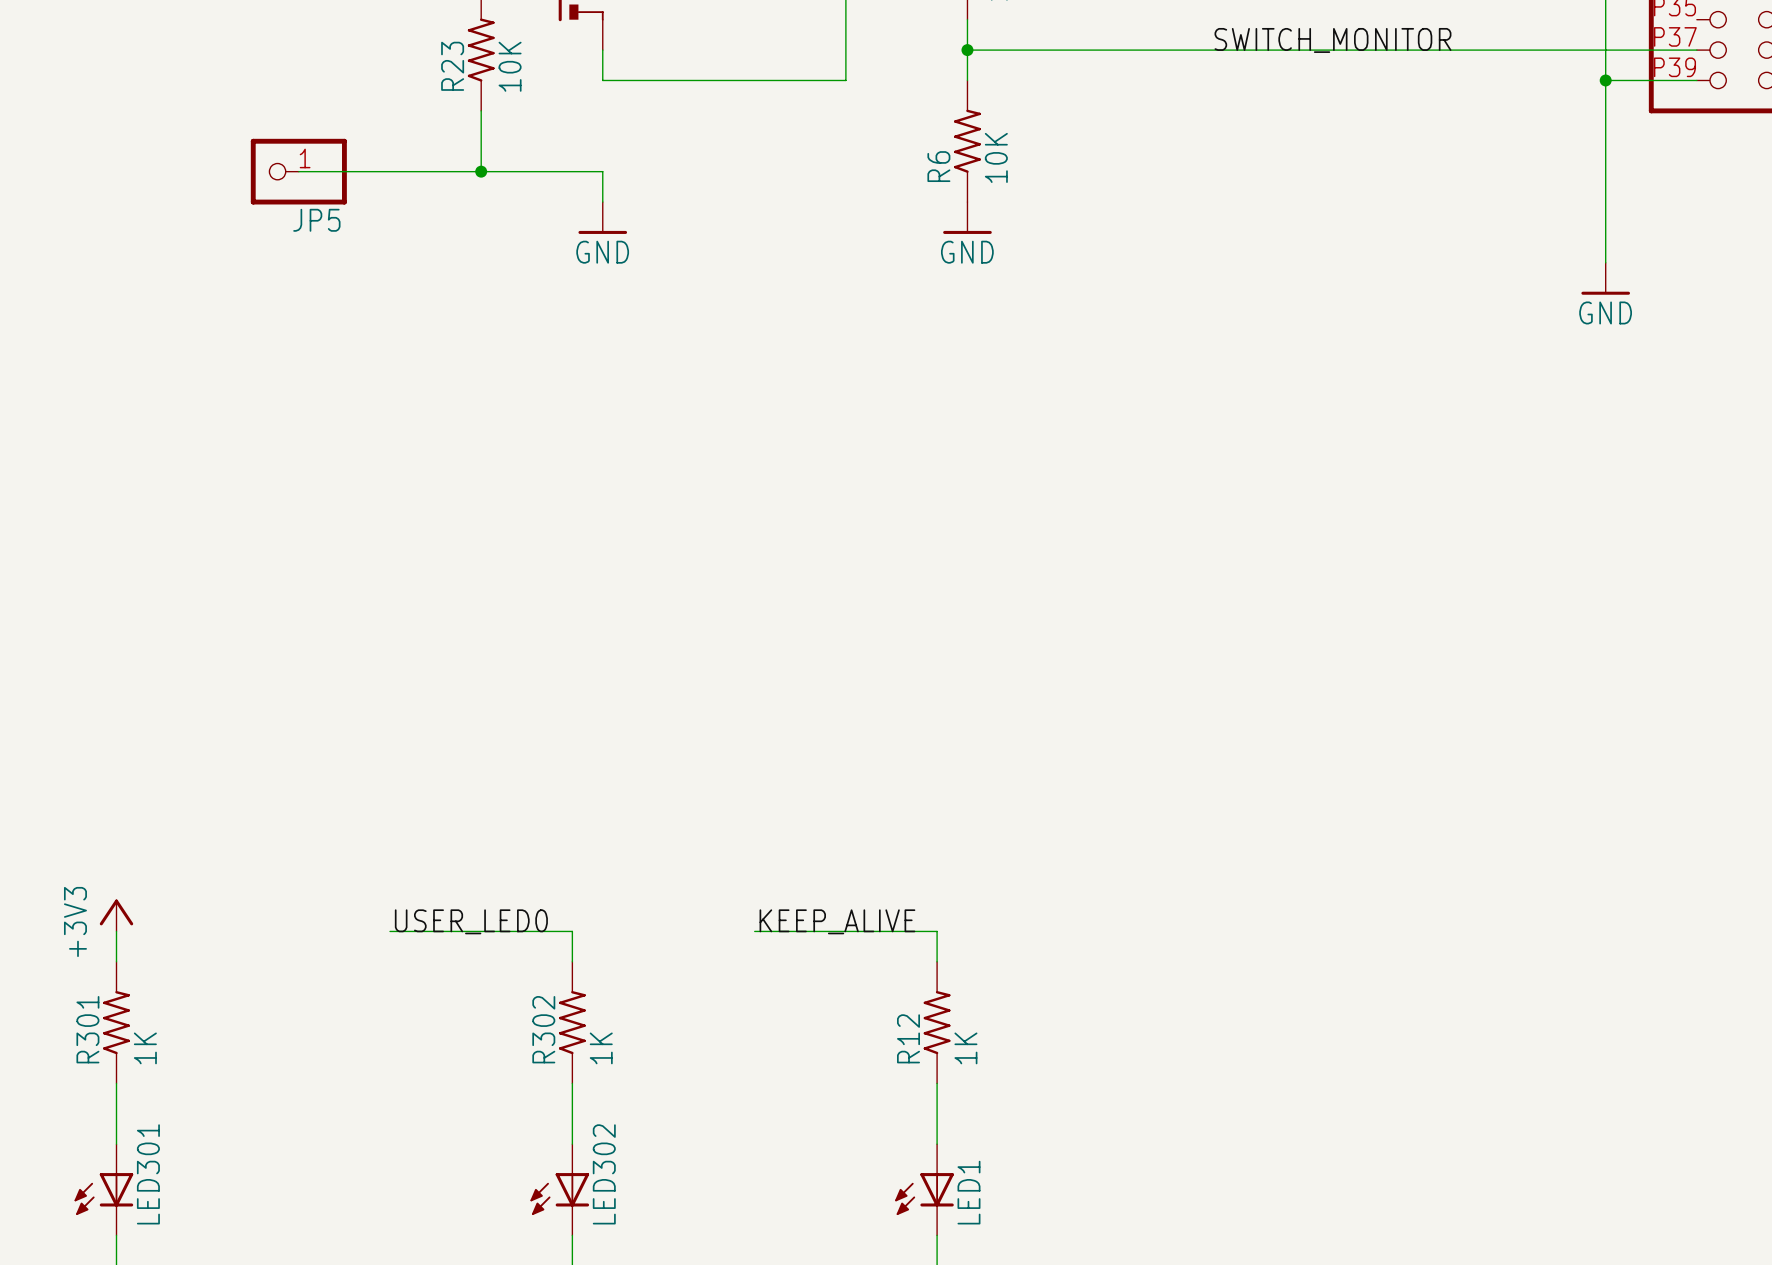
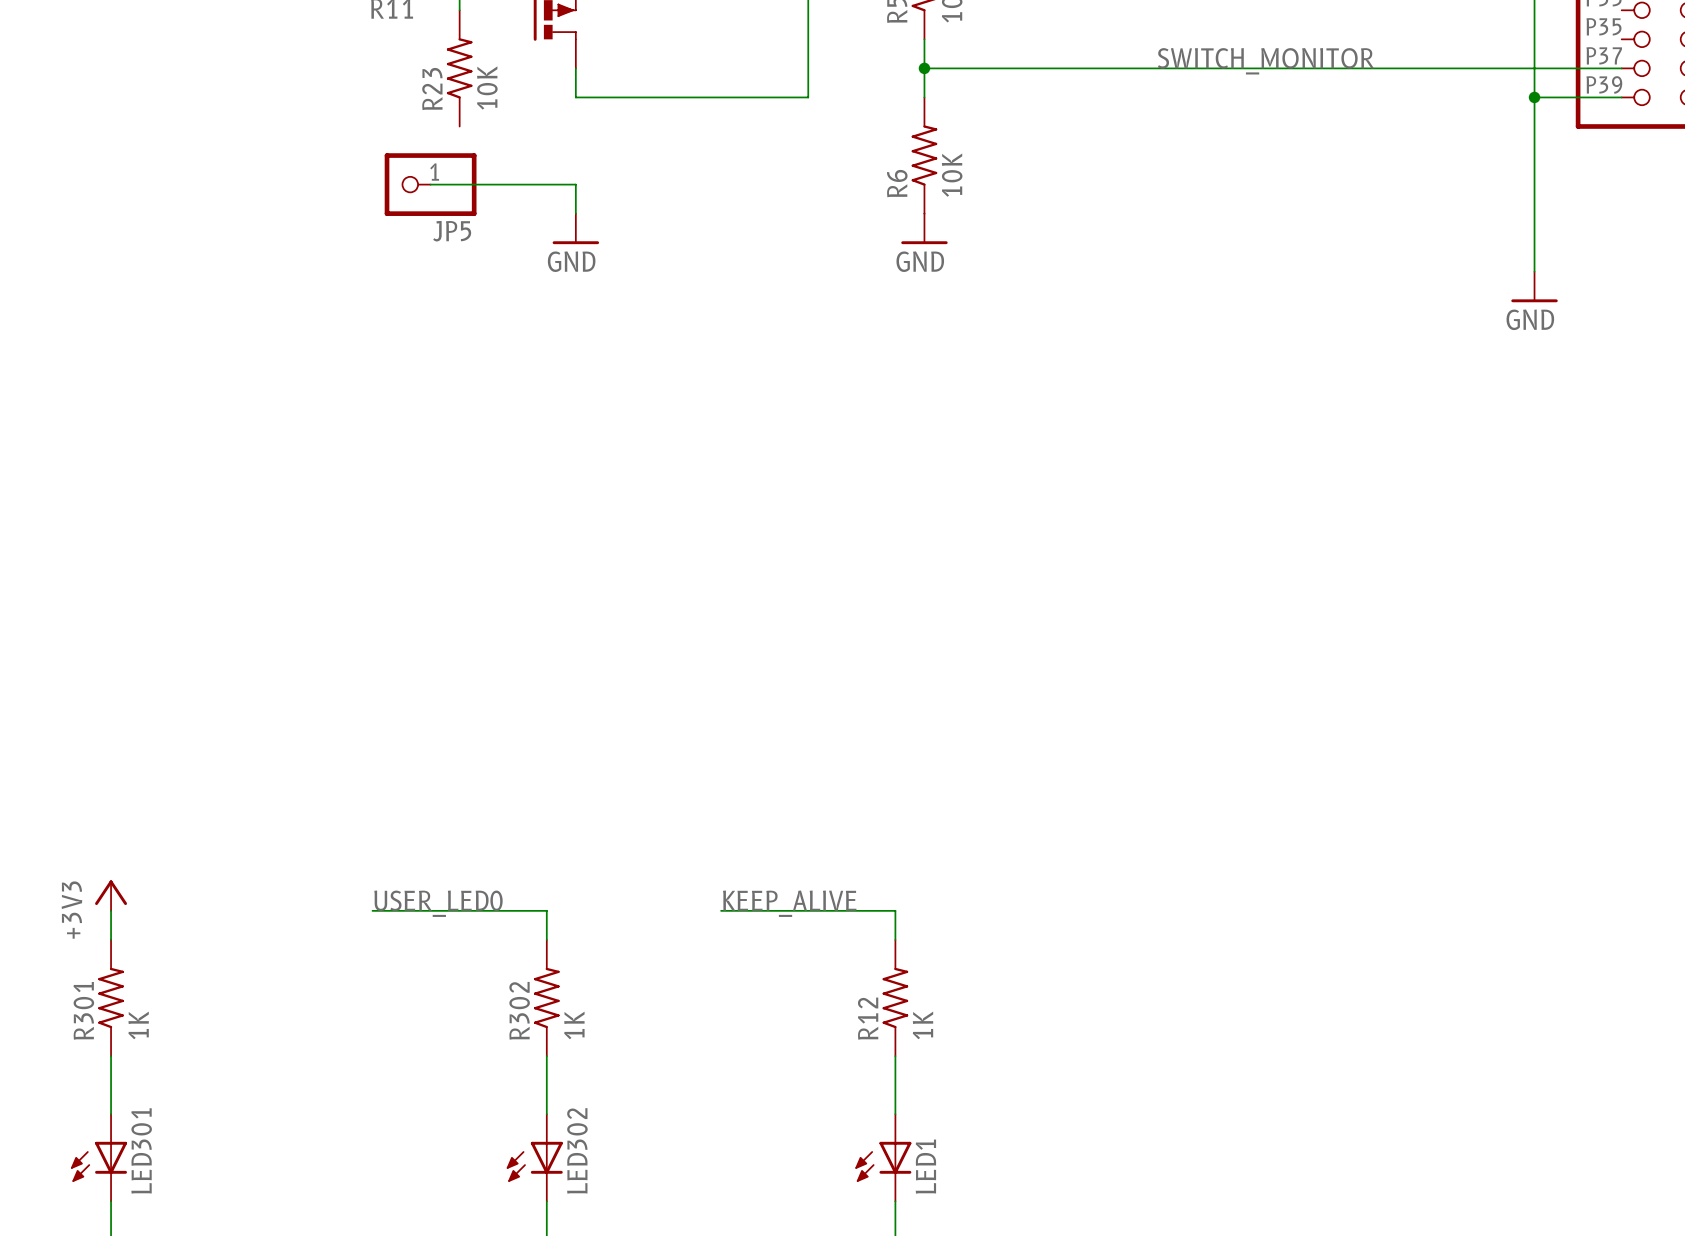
wire: (481, 110) (481, 171) -> none
wire: (298, 171) (450, 171) -> none
JP5 position: (298, 171) -> (430, 184)
junction: (481, 171) -> none

